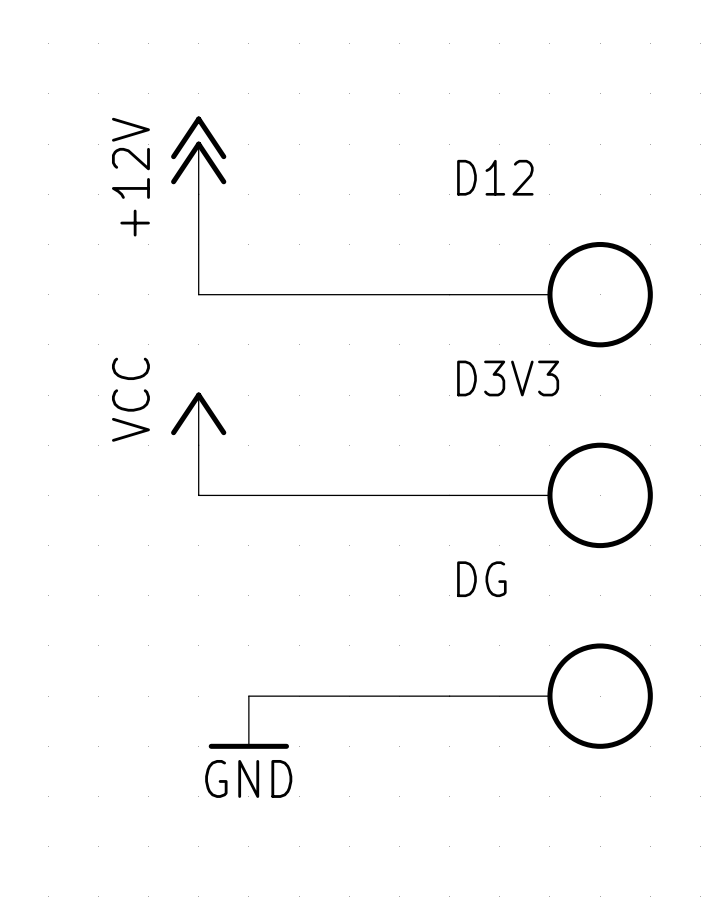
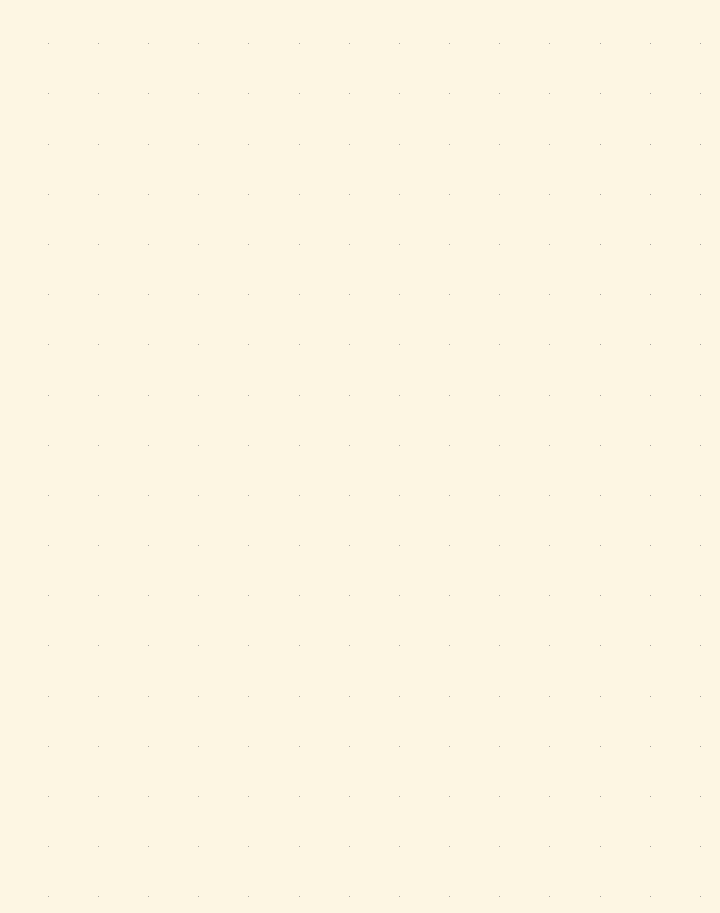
power symbol: +12V (198, 155) -> none
wire: (198, 194) (198, 294) (449, 294) -> none
D12: (551, 294) -> none
power symbol: VCC (198, 418) -> none
wire: (198, 445) (198, 495) (449, 495) -> none
D3V3: (551, 495) -> none
wire: (248, 696) (449, 696) -> none
DG: (551, 696) -> none
power symbol: GND (248, 722) -> none

